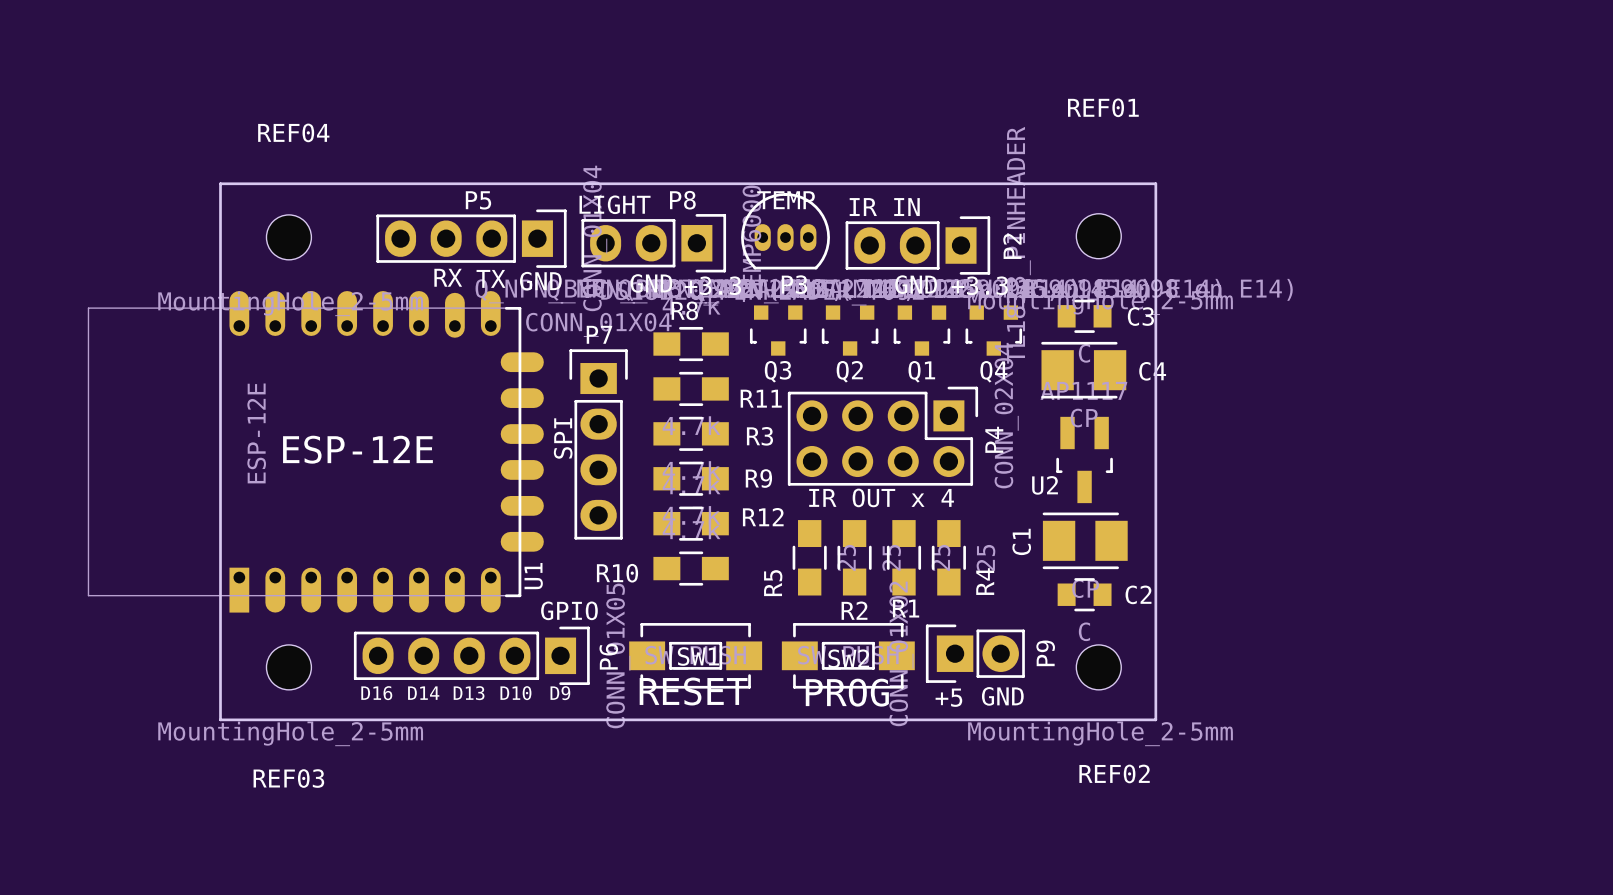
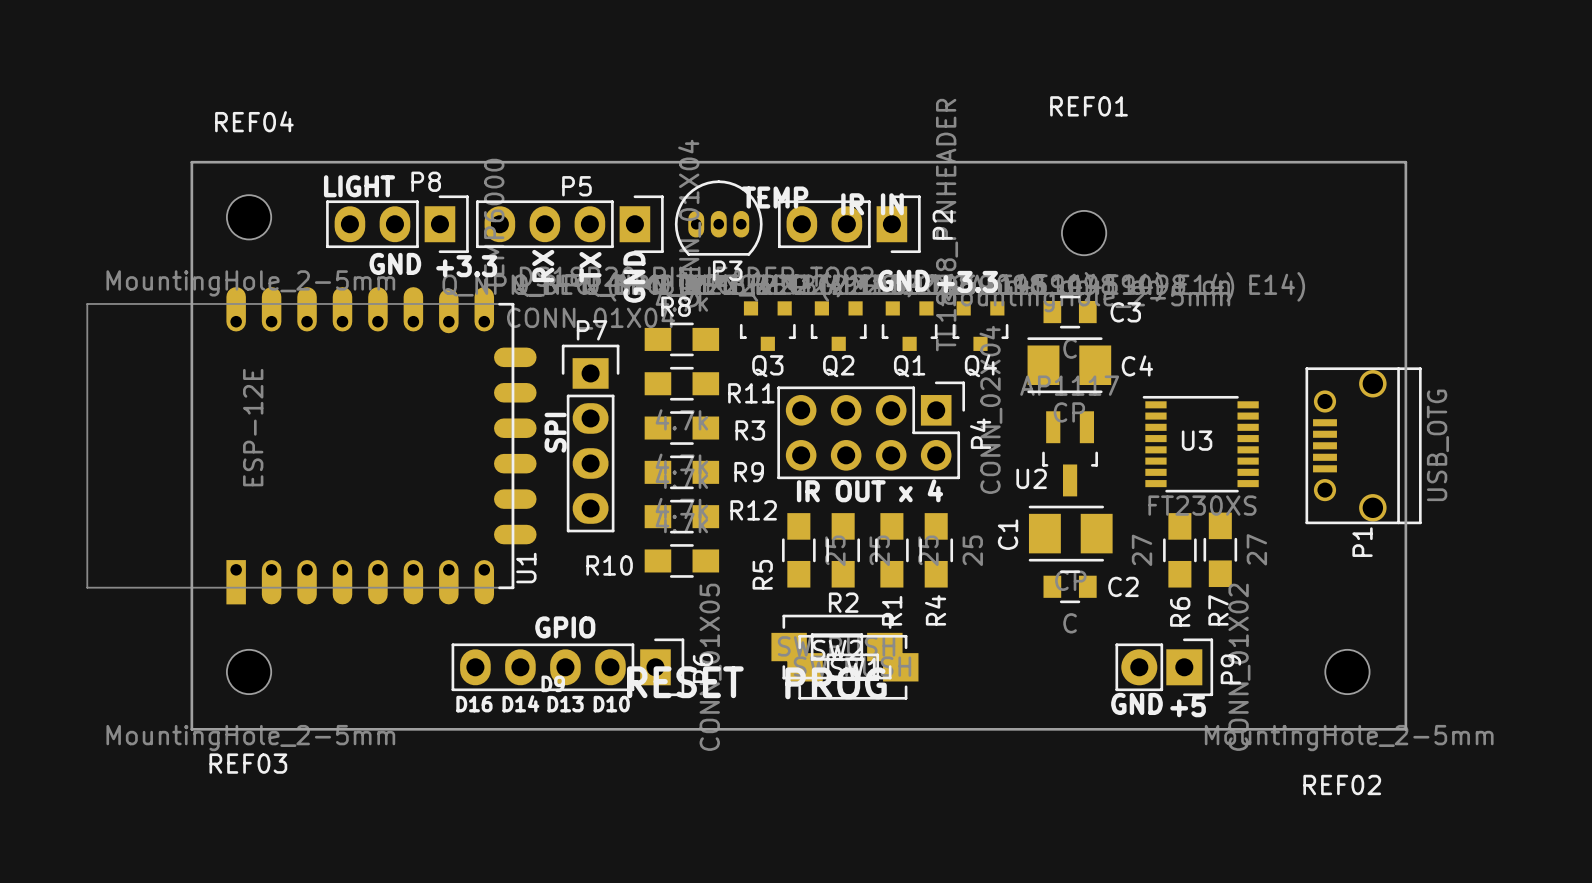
REF04 name position: REF04 (293, 132) -> REF04 (254, 121)
board edge: (220, 183) (220, 719) (1155, 719) (1155, 183) (220, 183) -> (191, 162) (191, 729) (1405, 729) (1405, 162) (191, 162)
text position: LIGHT (615, 204) -> LIGHT (359, 186)
P3 position: (785, 231) -> (718, 218)
REF04 position: (288, 237) -> (249, 217)
P5 position: (471, 238) -> (569, 224)
P8 position: (653, 243) -> (397, 224)
P2 position: (917, 245) -> (849, 224)
text rotation: 0° (448, 277) -> 90° counterclockwise (543, 265)
text position: RX (448, 277) -> RX (543, 265)
text rotation: 0° (491, 278) -> 90° counterclockwise (590, 267)
text position: TX (491, 278) -> TX (590, 267)
text position: GND (540, 281) -> GND (395, 263)
text rotation: 0° (651, 283) -> 90° counterclockwise (634, 276)
text position: +3.3 (712, 285) -> +3.3 (466, 266)
text: ESP-12E (357, 449) -> none
U3: none -> FT230XS (1200, 444)
P1: none -> USB_OTG (1363, 445)
R6: none -> 27 (1179, 550)
R7: none -> 27 (1220, 549)
R4 name position: R4 (985, 581) -> R4 (935, 610)
R1 name rotation: 0° (906, 608) -> 90° counterclockwise (892, 610)
text position: GPIO (569, 610) -> GPIO (565, 627)
P9 rotation: 0° (975, 653) -> 180° (1164, 667)
P9 position: (975, 653) -> (1164, 667)
P6 position: (471, 655) -> (567, 667)
SW1 position: (695, 655) -> (852, 667)
REF03 position: (288, 667) -> (249, 671)
REF02 position: (1098, 667) -> (1347, 671)
text position: D16 (376, 693) -> D16 (474, 704)
text position: D14 (423, 693) -> D14 (520, 703)
text position: D13 (469, 693) -> D13 (565, 704)
text position: D10 (515, 693) -> D10 (611, 704)
text position: GND (1002, 696) -> GND (1136, 703)
text position: +5 (948, 697) -> +5 (1188, 706)
REF02 name position: REF02 (1114, 773) -> REF02 (1342, 784)
REF03 name position: REF03 (288, 778) -> REF03 (248, 763)

